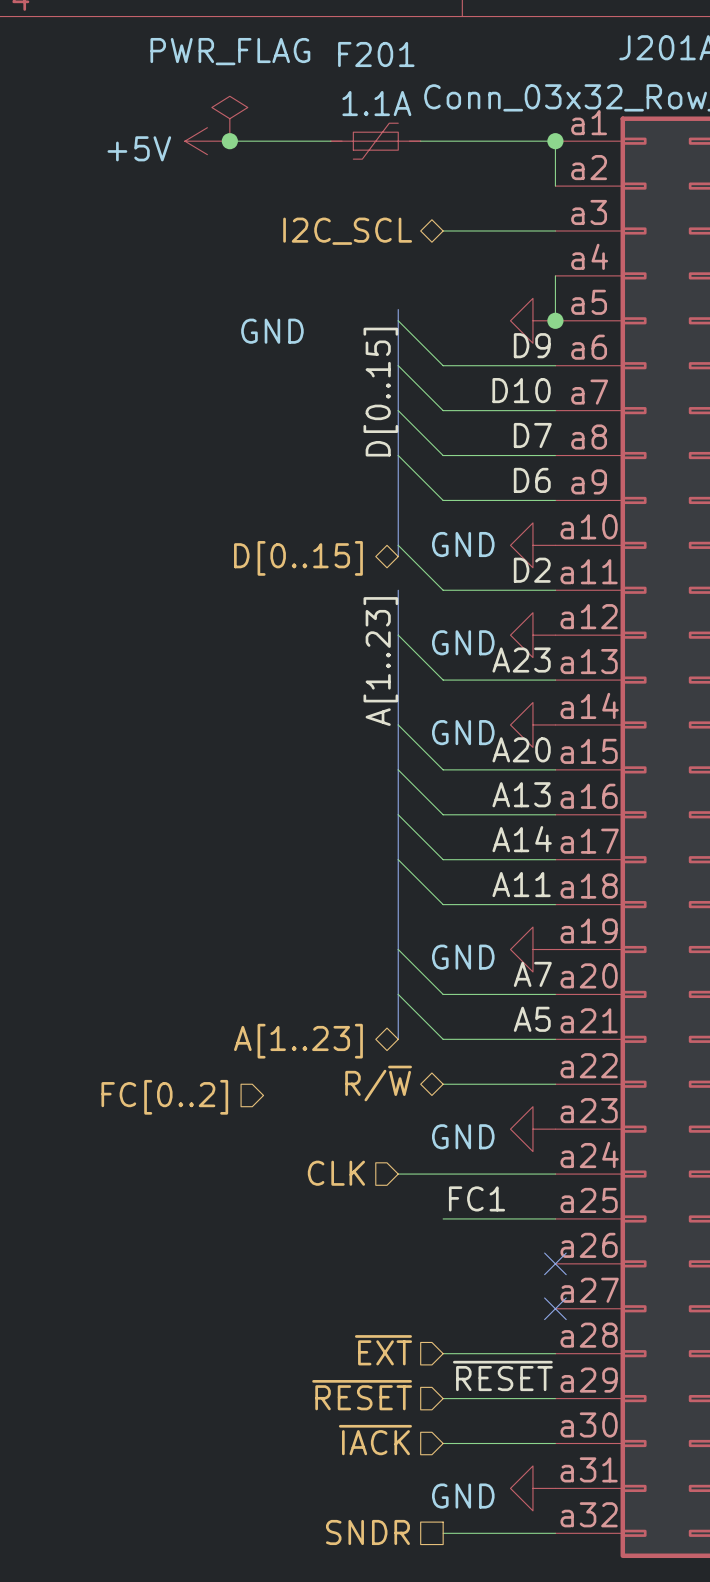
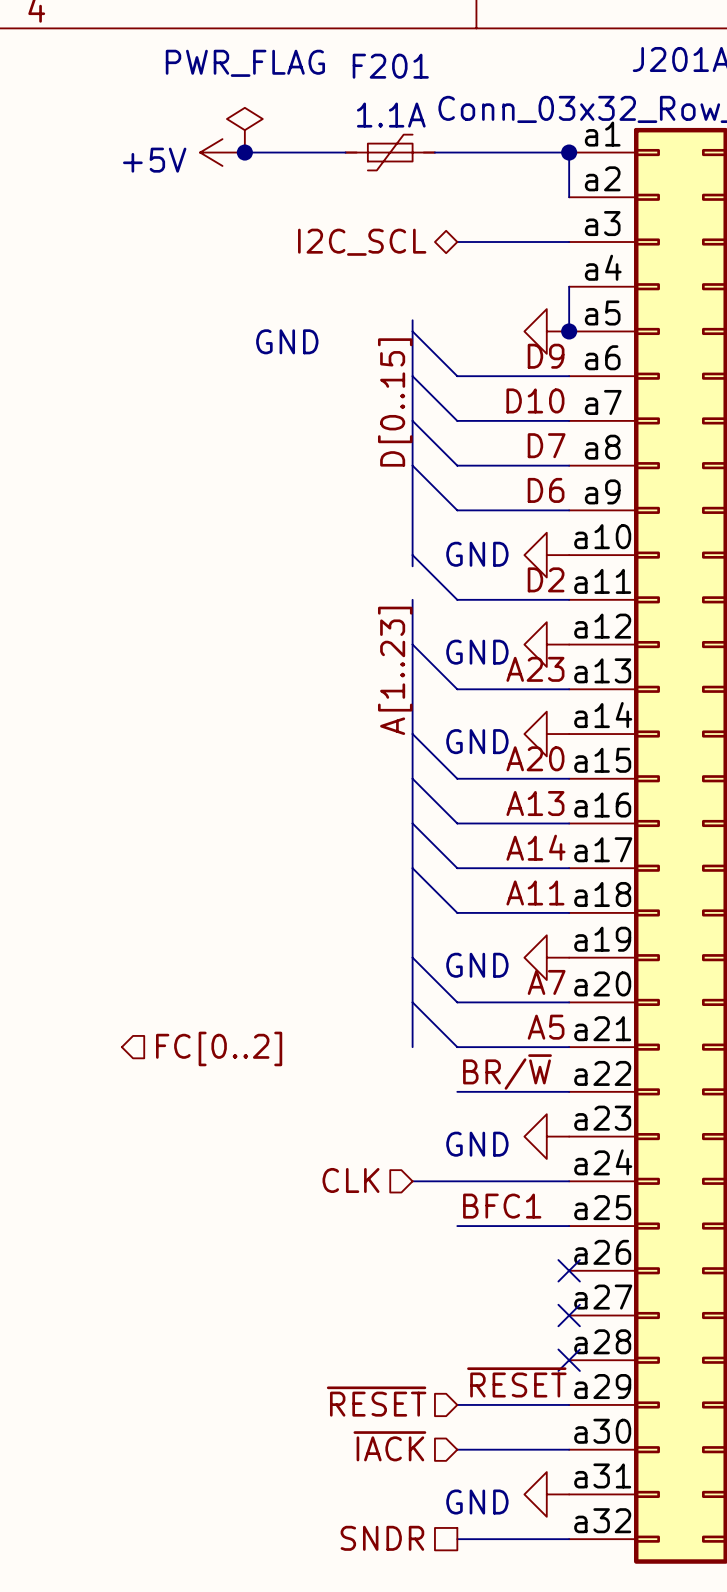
hierarchical label: D[0..15] (298, 558) -> none
hierarchical label: A[1..23] (298, 1041) -> none
label: none -> BR/~{W} (507, 1071)
hierarchical label: R/~{W} (378, 1083) -> none
hierarchical label rotation: 0° (164, 1097) -> 180° (219, 1048)
label: FC1 (477, 1198) -> BFC1 (502, 1206)
hierarchical label: ~{EXT} (383, 1350) -> none
wire: (443, 1353) (555, 1353) -> none
no-connect mark: none -> (569, 1360)

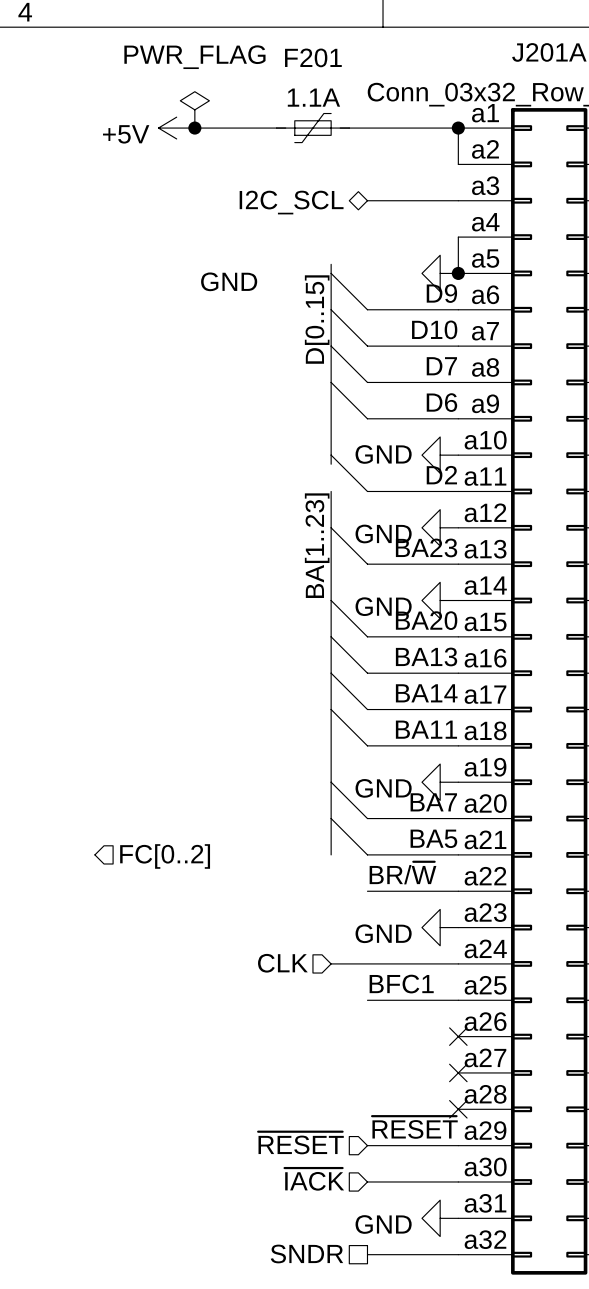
label: A23 (535, 669) -> BA23 (426, 547)
label: A[1..23] (395, 670) -> BA[1..23] (317, 545)
label: A20 (535, 758) -> BA20 (426, 620)
label: A13 (535, 803) -> BA13 (426, 656)
label: A14 (535, 847) -> BA14 (426, 693)
label: A11 (535, 892) -> BA11 (426, 729)
label: A7 (546, 982) -> BA7 (433, 802)
label: A5 (546, 1027) -> BA5 (433, 838)

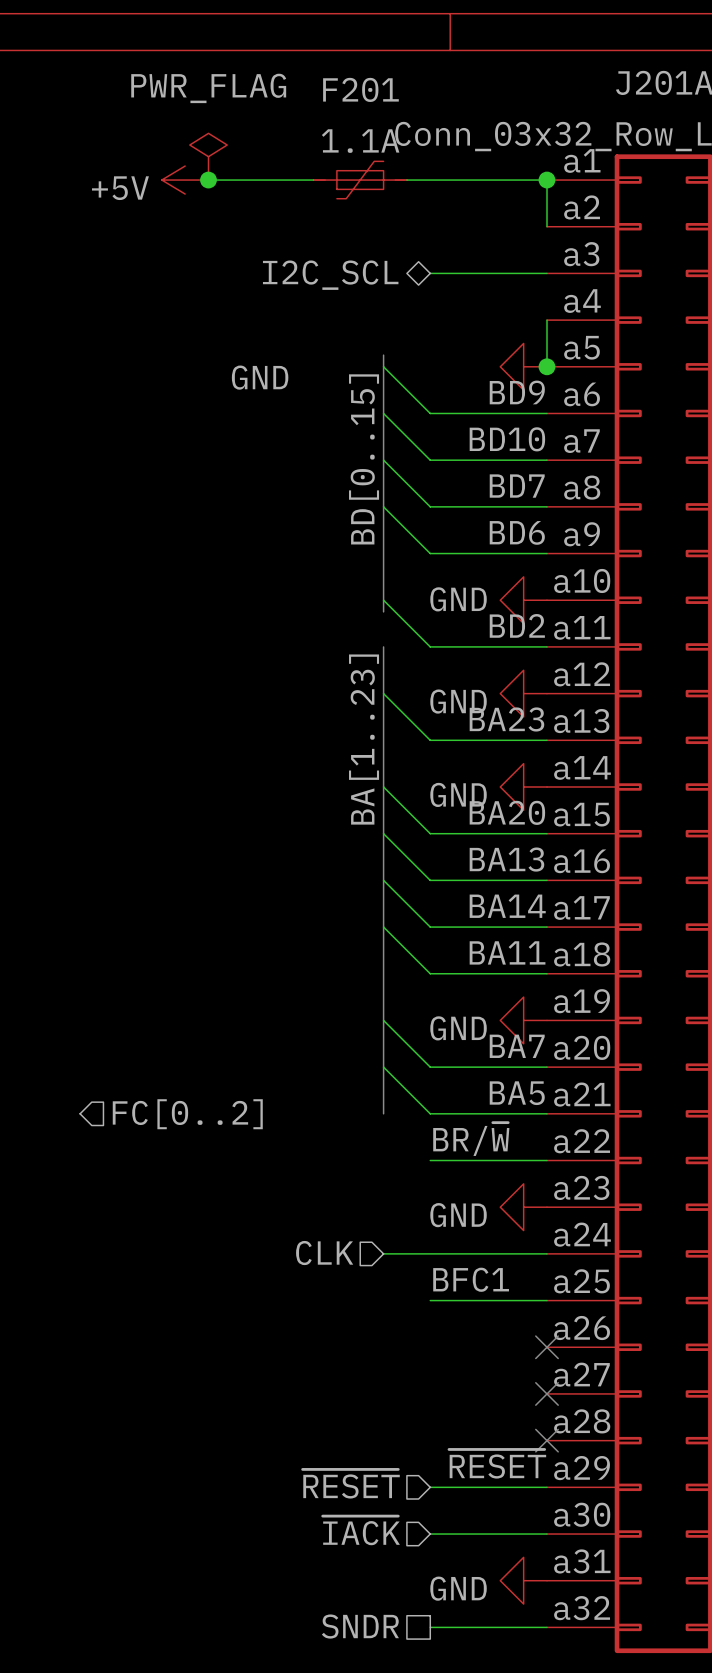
label: D9 (441, 293) -> BD9 (517, 392)
label: D[0..15] (317, 319) -> BD[0..15] (364, 459)
label: D10 (434, 329) -> BD10 (507, 439)
label: D7 (441, 366) -> BD7 (517, 486)
label: D6 (441, 402) -> BD6 (517, 532)
label: D2 (441, 475) -> BD2 (517, 625)

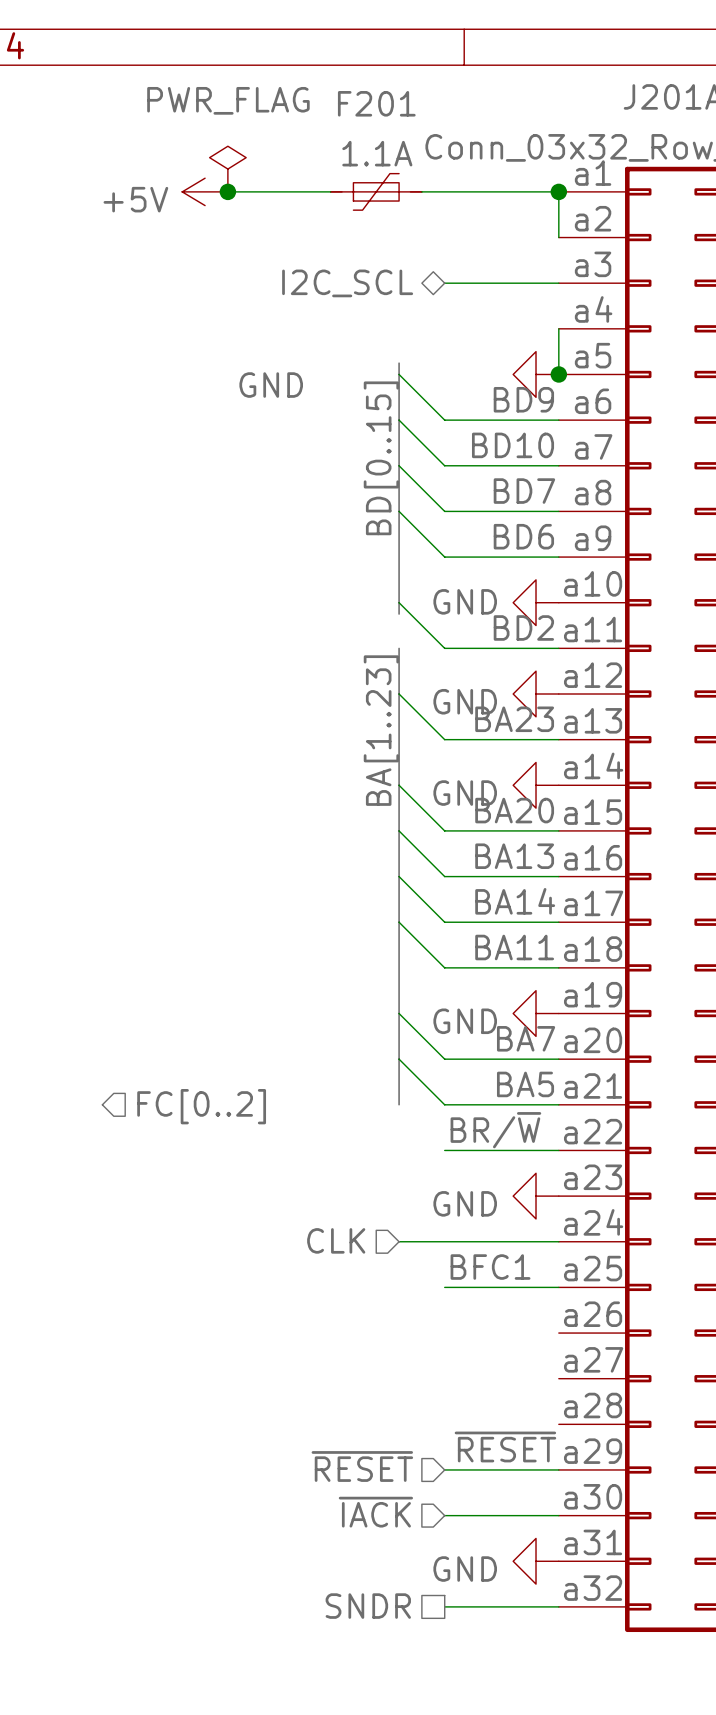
no-connect mark: (546, 1347) -> none
no-connect mark: (546, 1393) -> none
no-connect mark: (546, 1440) -> none

